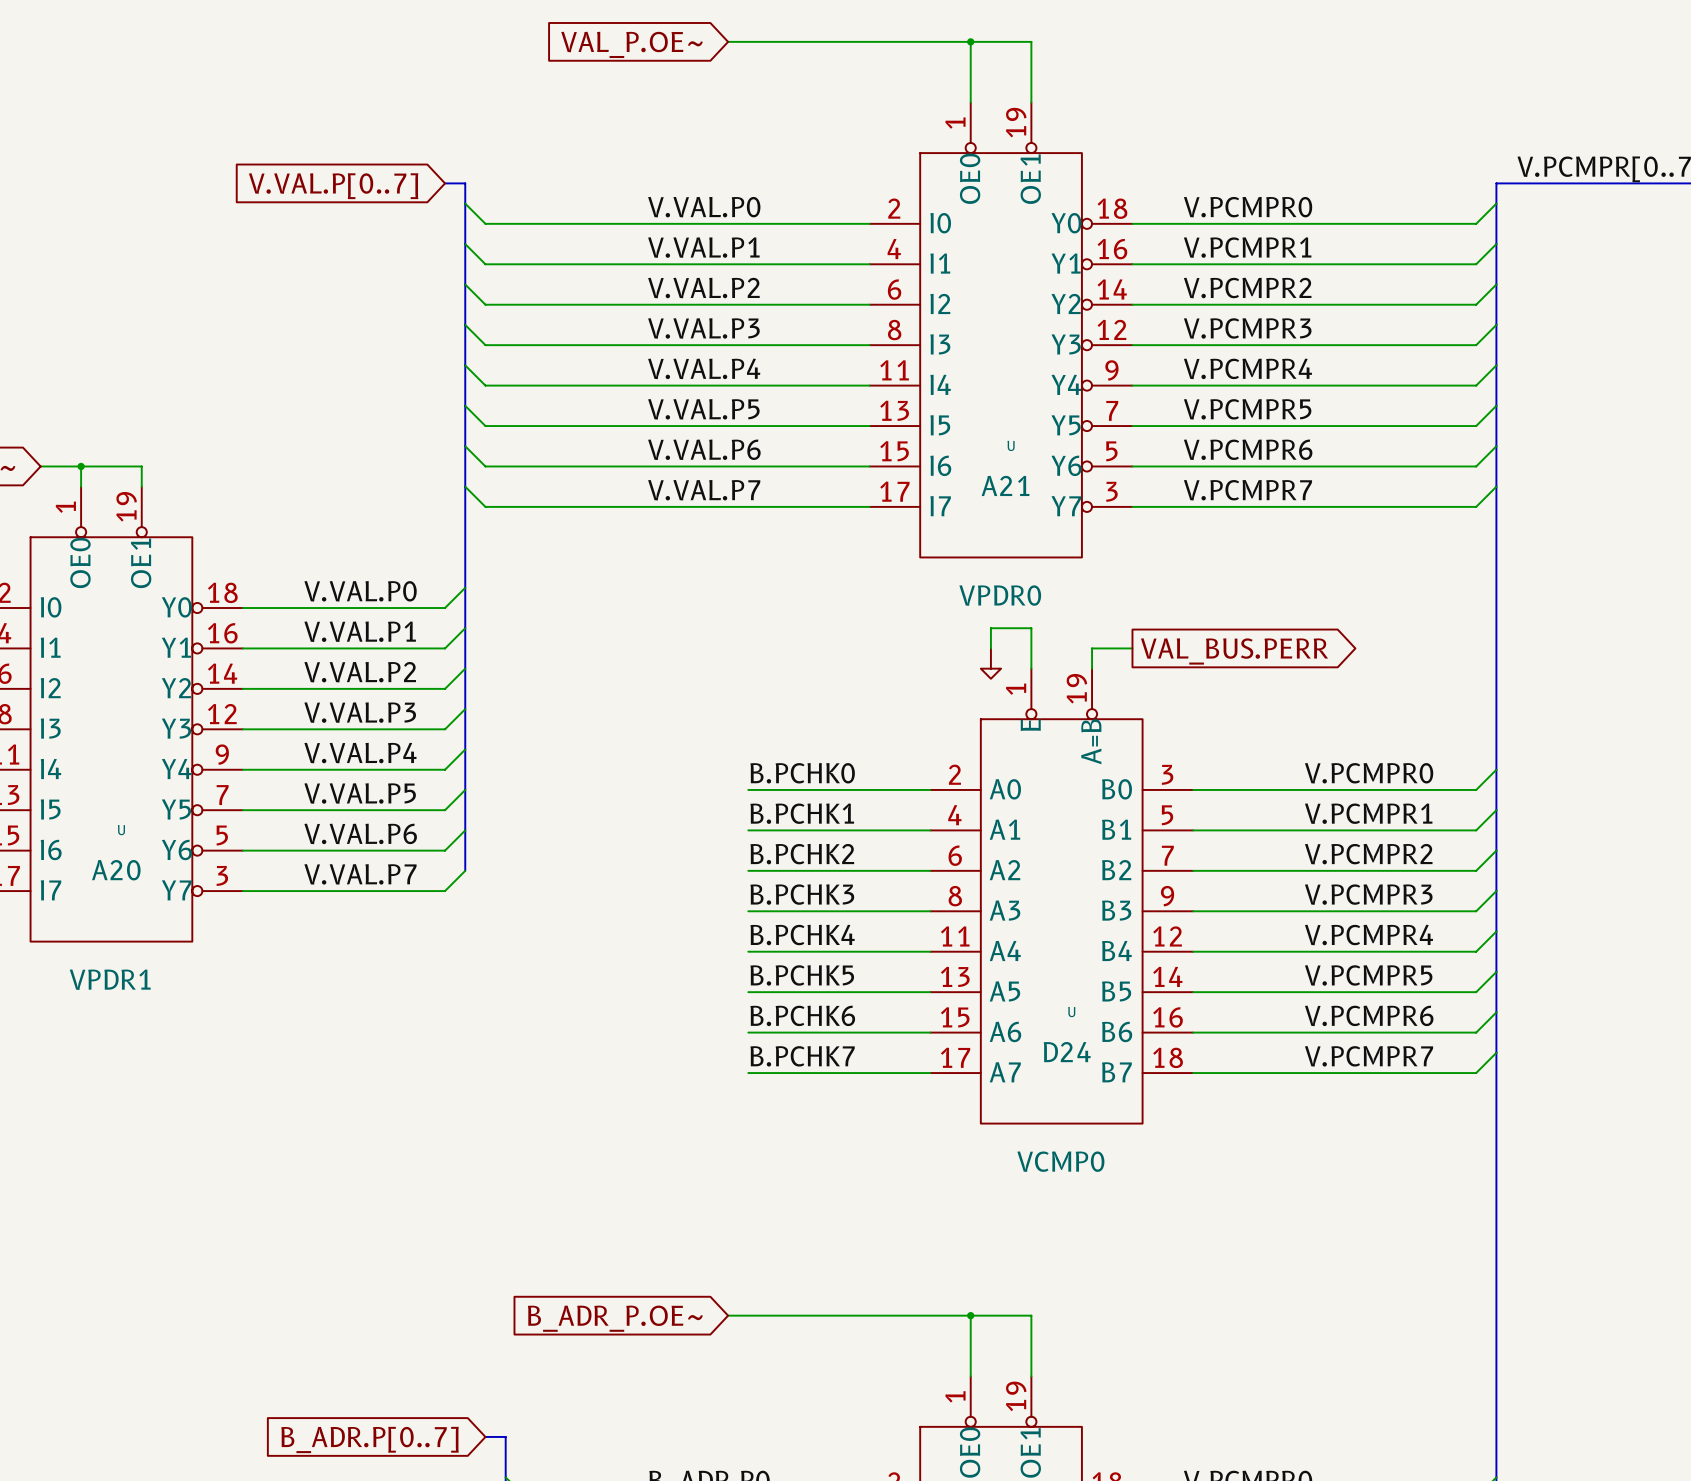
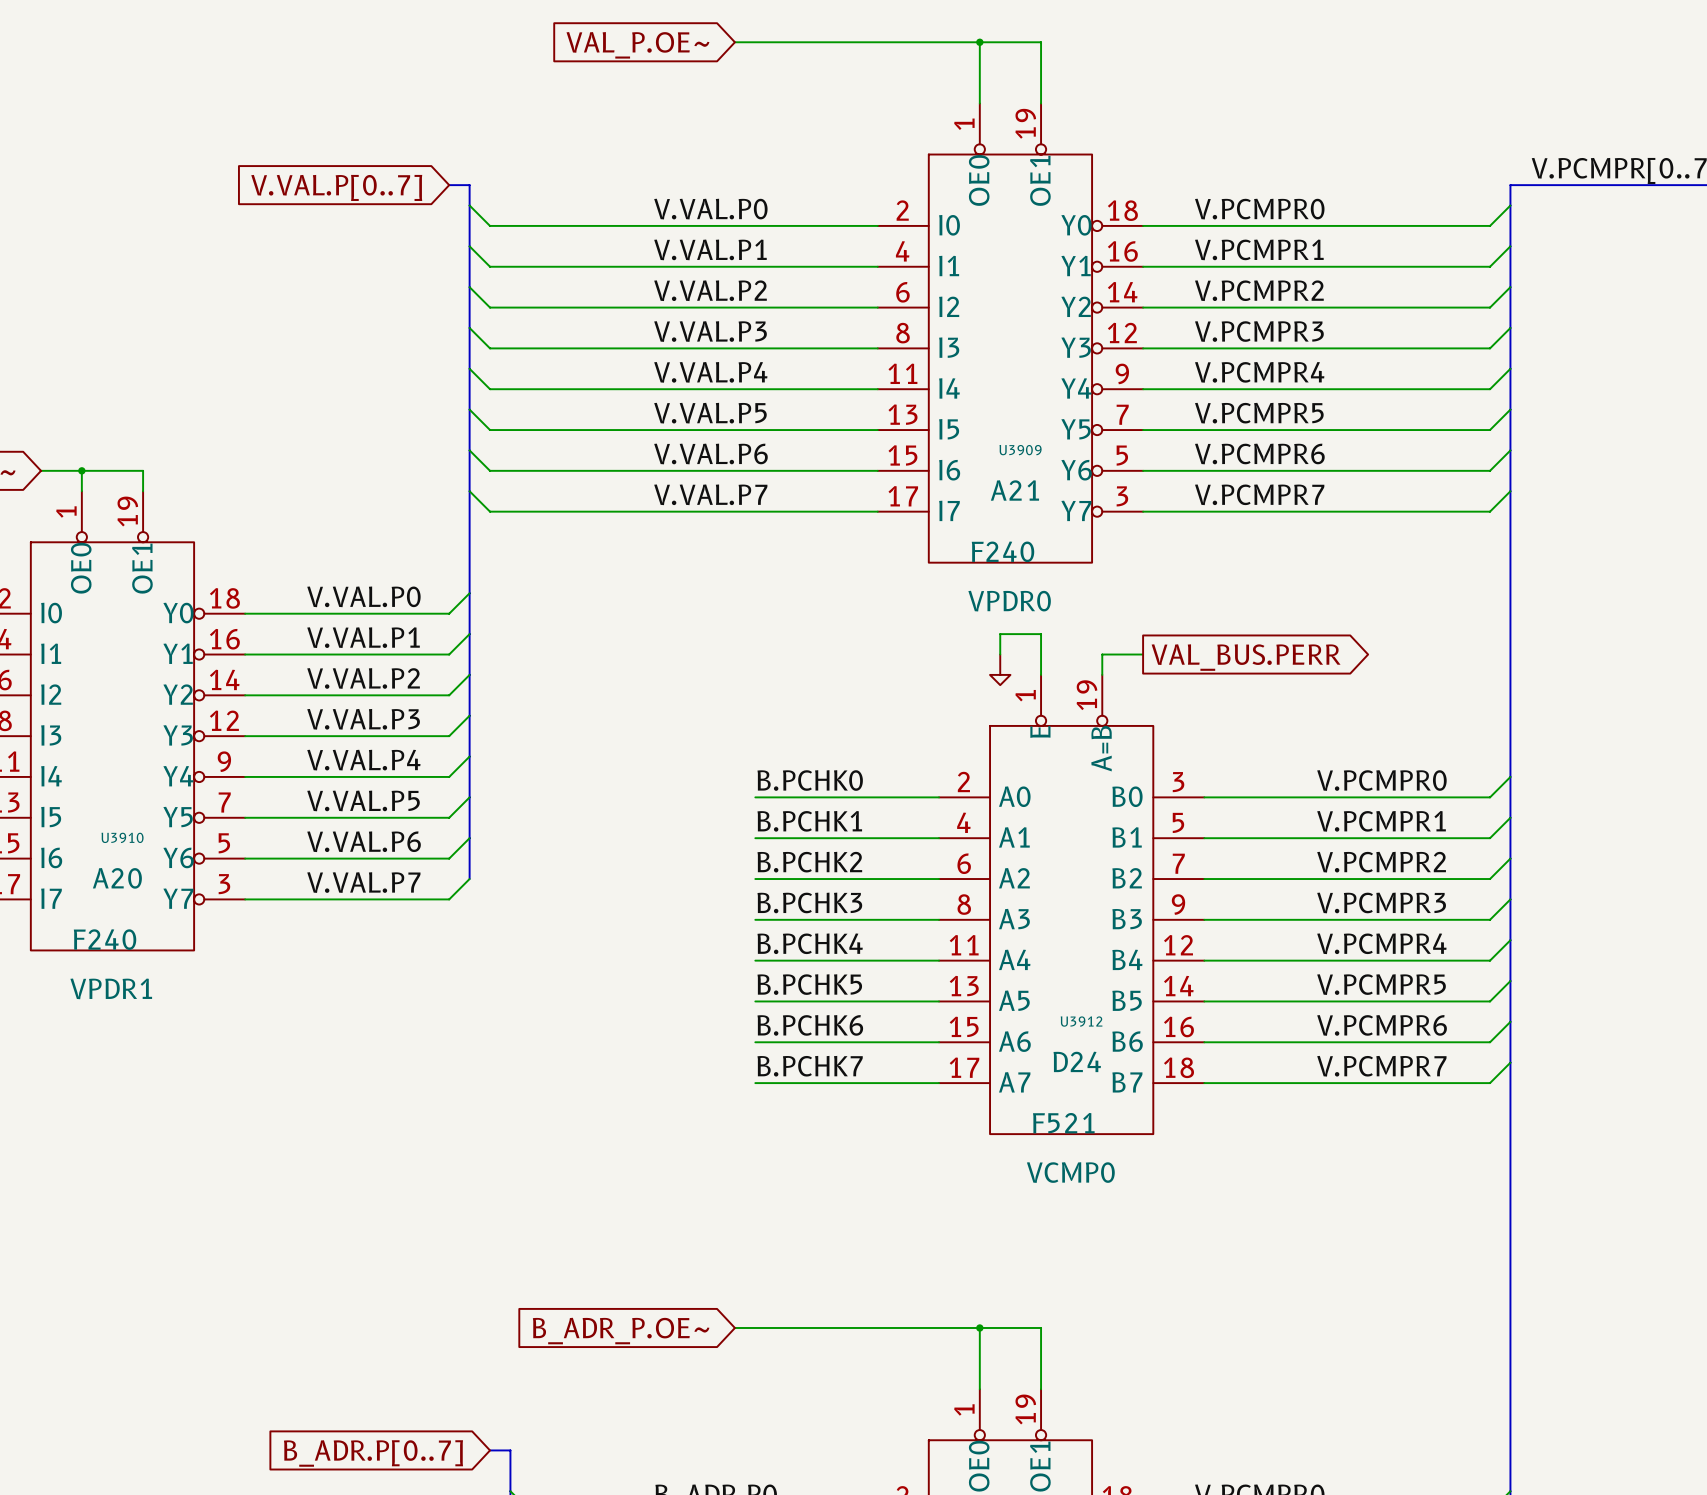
U name: U (1011, 445) -> U3909 (1020, 450)
U value: none -> F240 (1002, 551)
U name: U (121, 830) -> U3910 (122, 837)
U value: none -> F240 (105, 939)
U name: U (1071, 1012) -> U3912 (1081, 1021)
U value: none -> F521 (1063, 1123)

